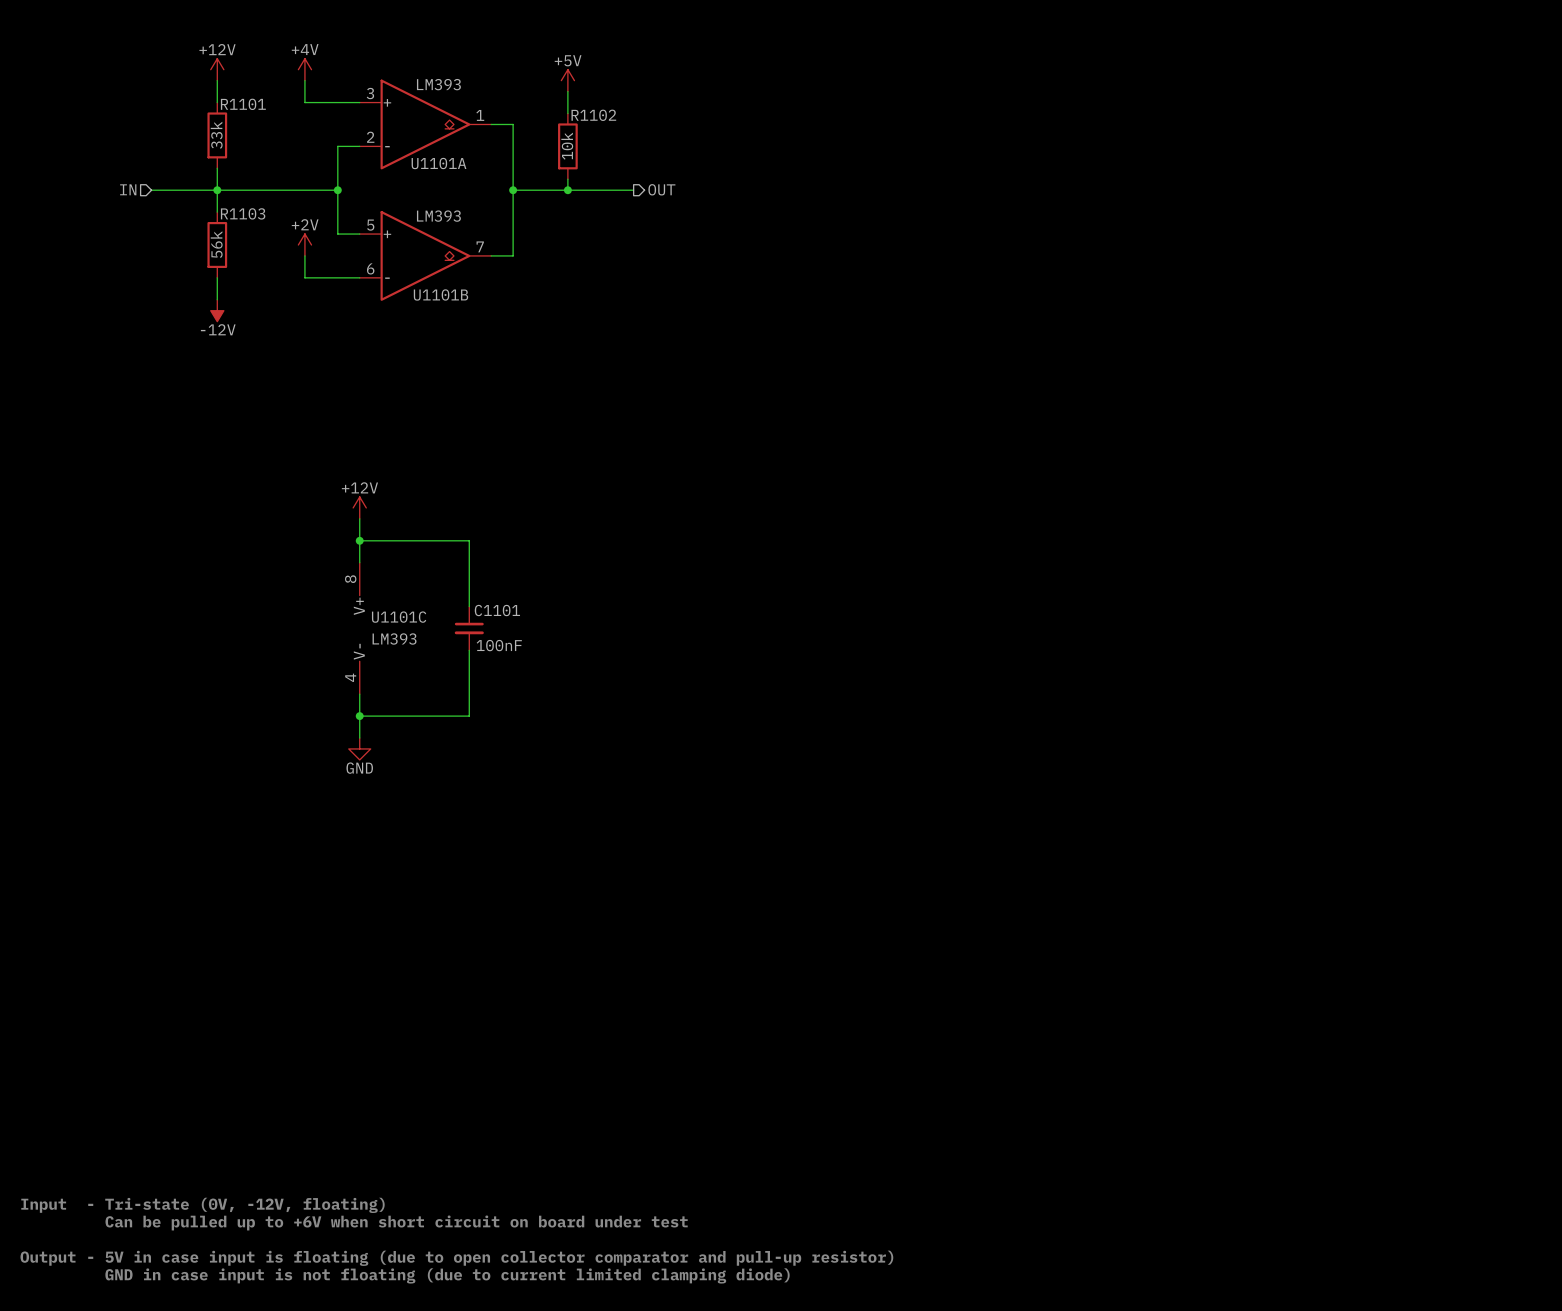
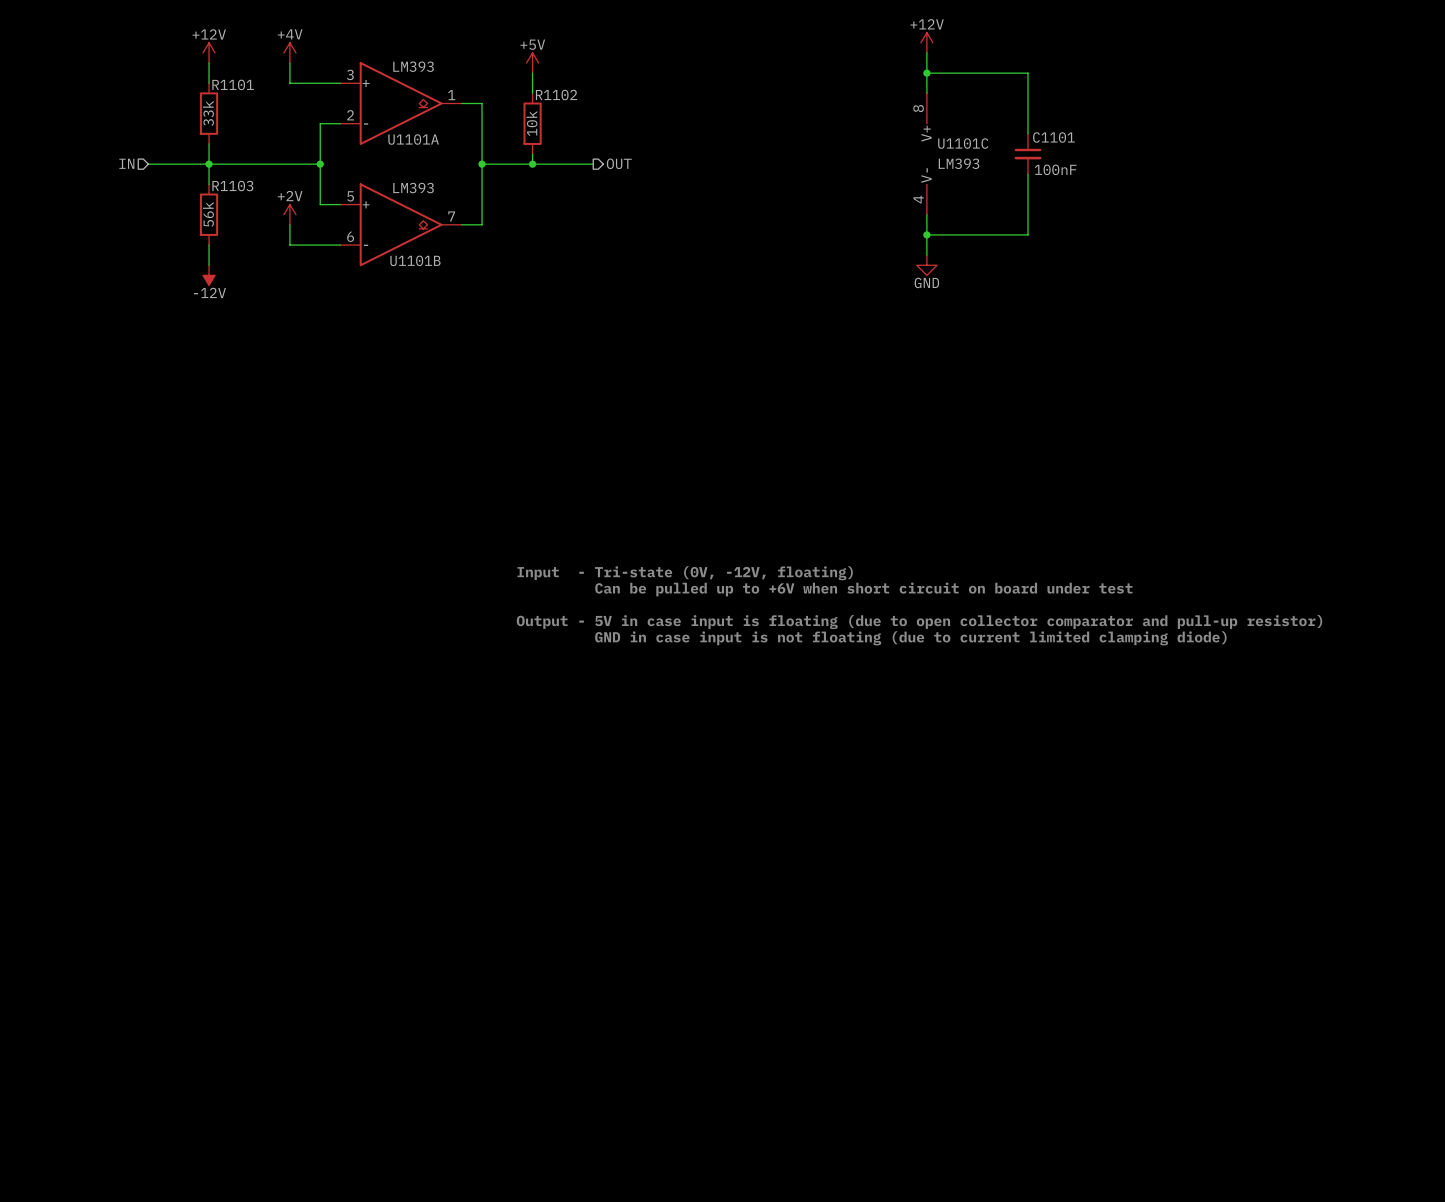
power symbol: none -> +12V (926, 42)
wire: none -> (926, 52) (926, 93)
wire: none -> (926, 73) (1028, 73) (1028, 133)
junction: none -> (926, 73)
wire: none -> (1028, 174) (1028, 234) (926, 234)
wire: none -> (926, 214) (926, 255)
junction: none -> (926, 234)
power symbol: none -> GND (926, 265)
power symbol: +12V (359, 507) -> none
wire: (359, 518) (359, 562) -> none
wire: (359, 540) (469, 540) (469, 606) -> none
junction: (359, 540) -> none
U1101C position: (359, 628) -> (926, 154)
C1101 position: (469, 628) -> (1028, 154)
text: none -> Input - Tri-state (0V, -12V, floating) (685, 573)
wire: (469, 650) (469, 716) (359, 716) -> none
text: none -> Can be pulled up to +6V when short circuit on board under test (863, 589)
text: none -> Output - 5V in case input is floating (due to open collector comparator and pull-up resistor) (919, 622)
wire: (359, 694) (359, 738) -> none
text: none -> GND in case input is not floating (due to current limited clamping diode) (910, 638)
junction: (359, 716) -> none
power symbol: GND (359, 748) -> none
text: Input - Tri-state (0V, -12V, floating) (202, 1205) -> none
text: Can be pulled up to +6V when short circuit on board under test (396, 1222) -> none
text: Output - 5V in case input is floating (due to open collector comparator and pull-up resistor) (456, 1258) -> none
text: GND in case input is not floating (due to current limited clamping diode) (447, 1275) -> none

